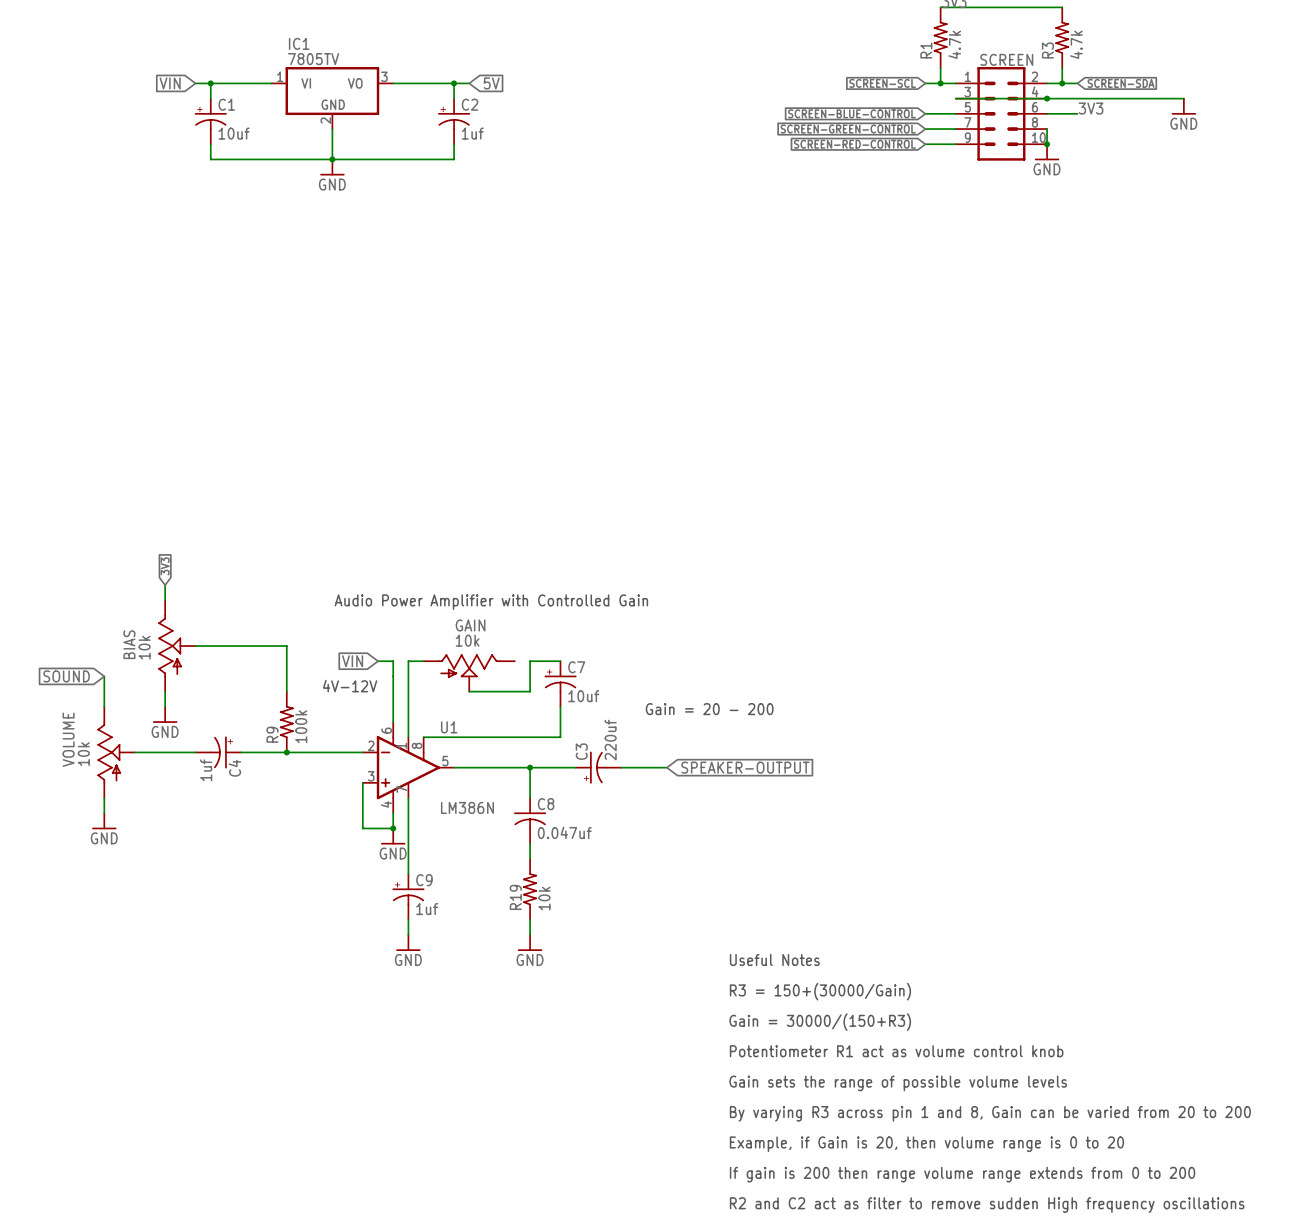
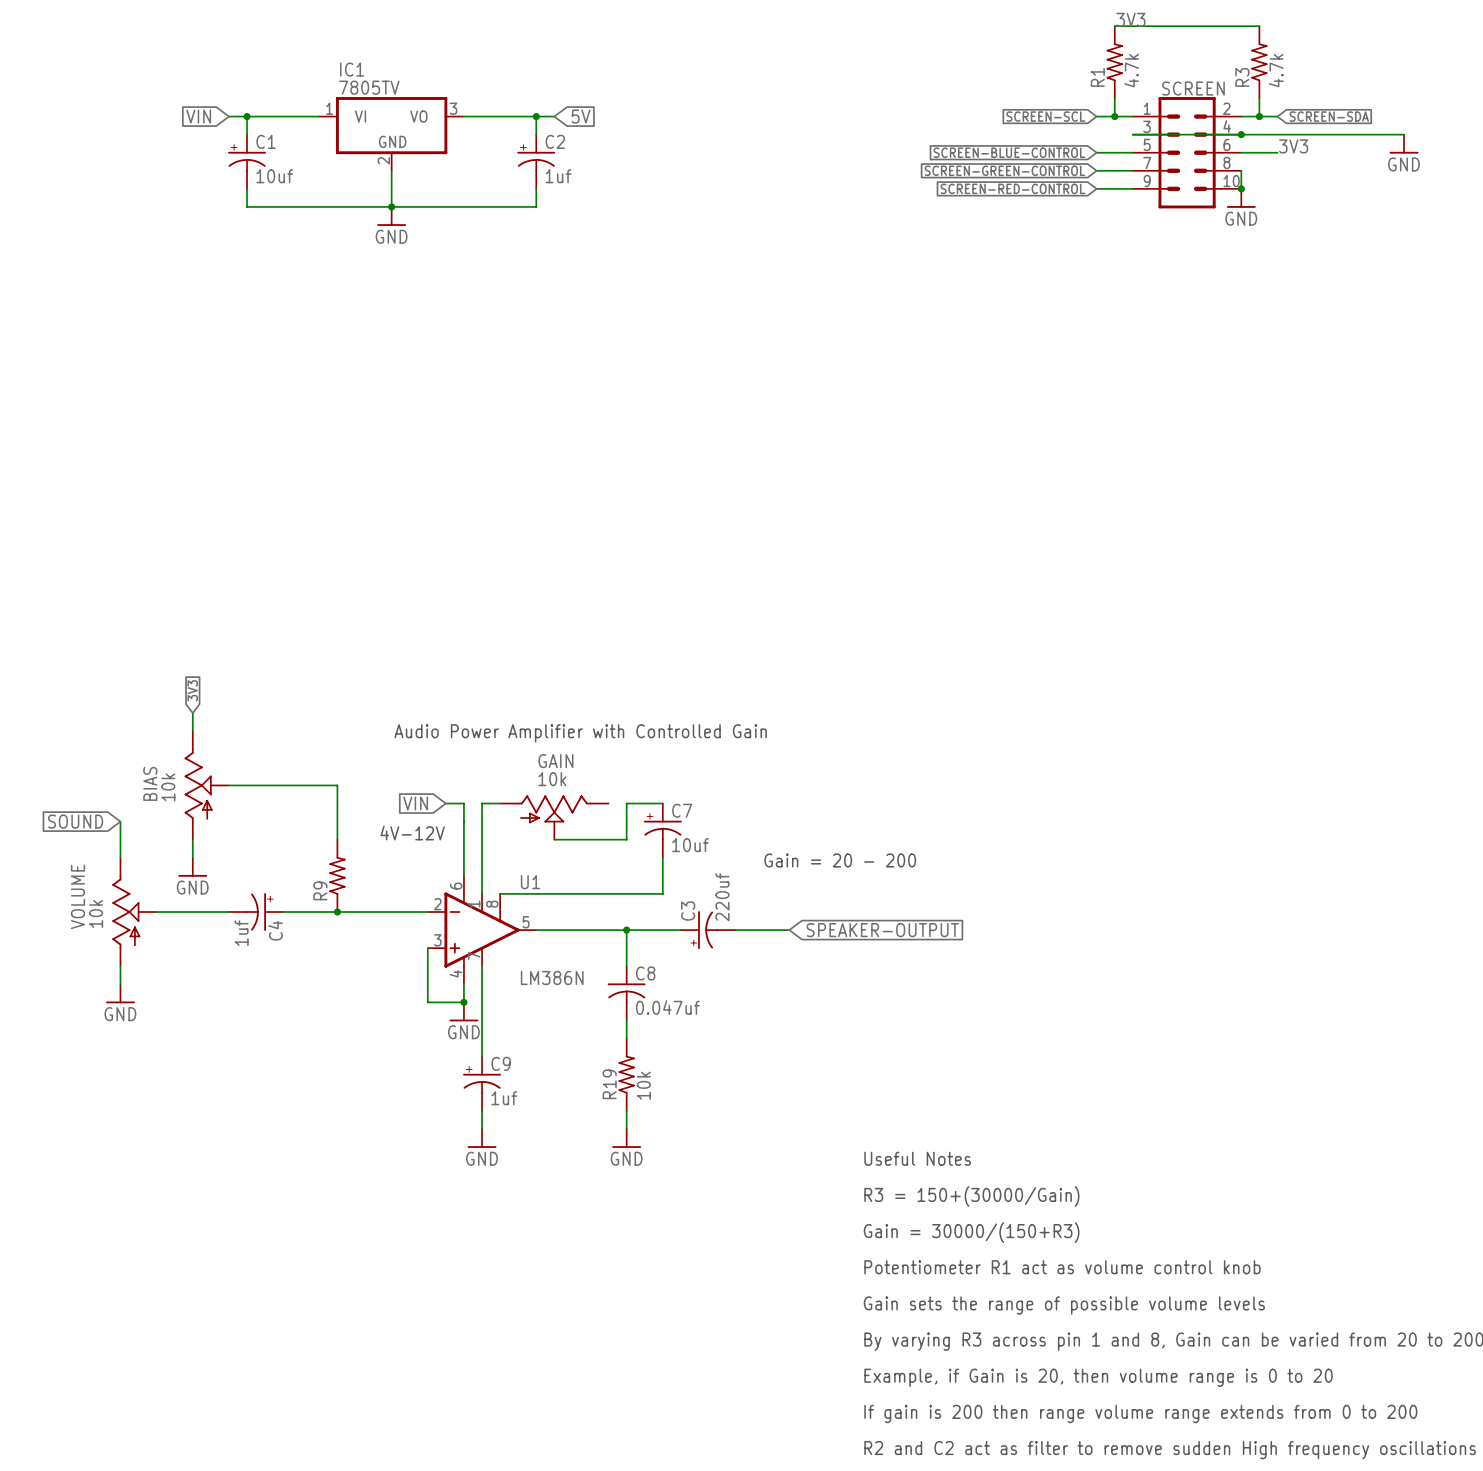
R9 value: 100k (301, 726) -> none

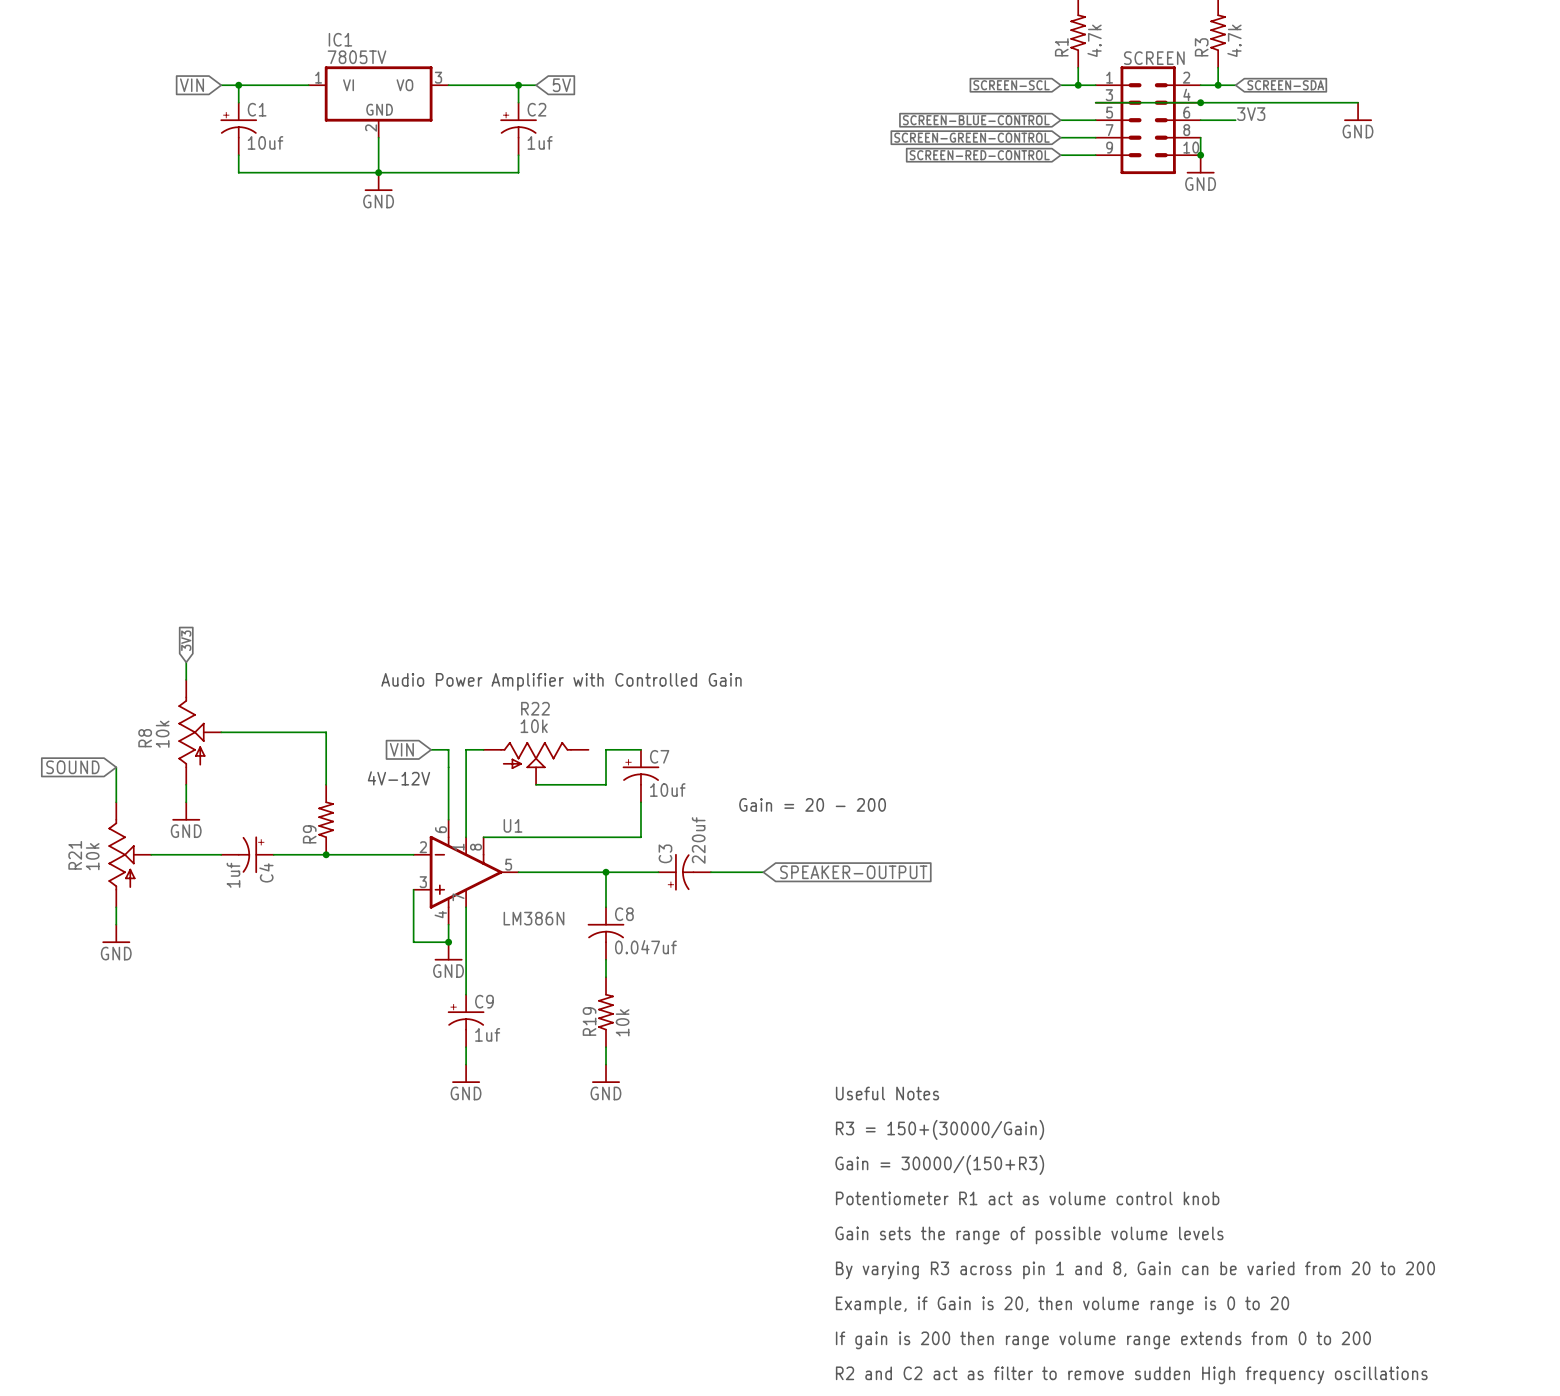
GAIN name: GAIN (555, 761) -> R22 (535, 708)
BIAS name: BIAS (150, 783) -> R8 (145, 738)
VOLUME name: VOLUME (77, 896) -> R21 (75, 855)

